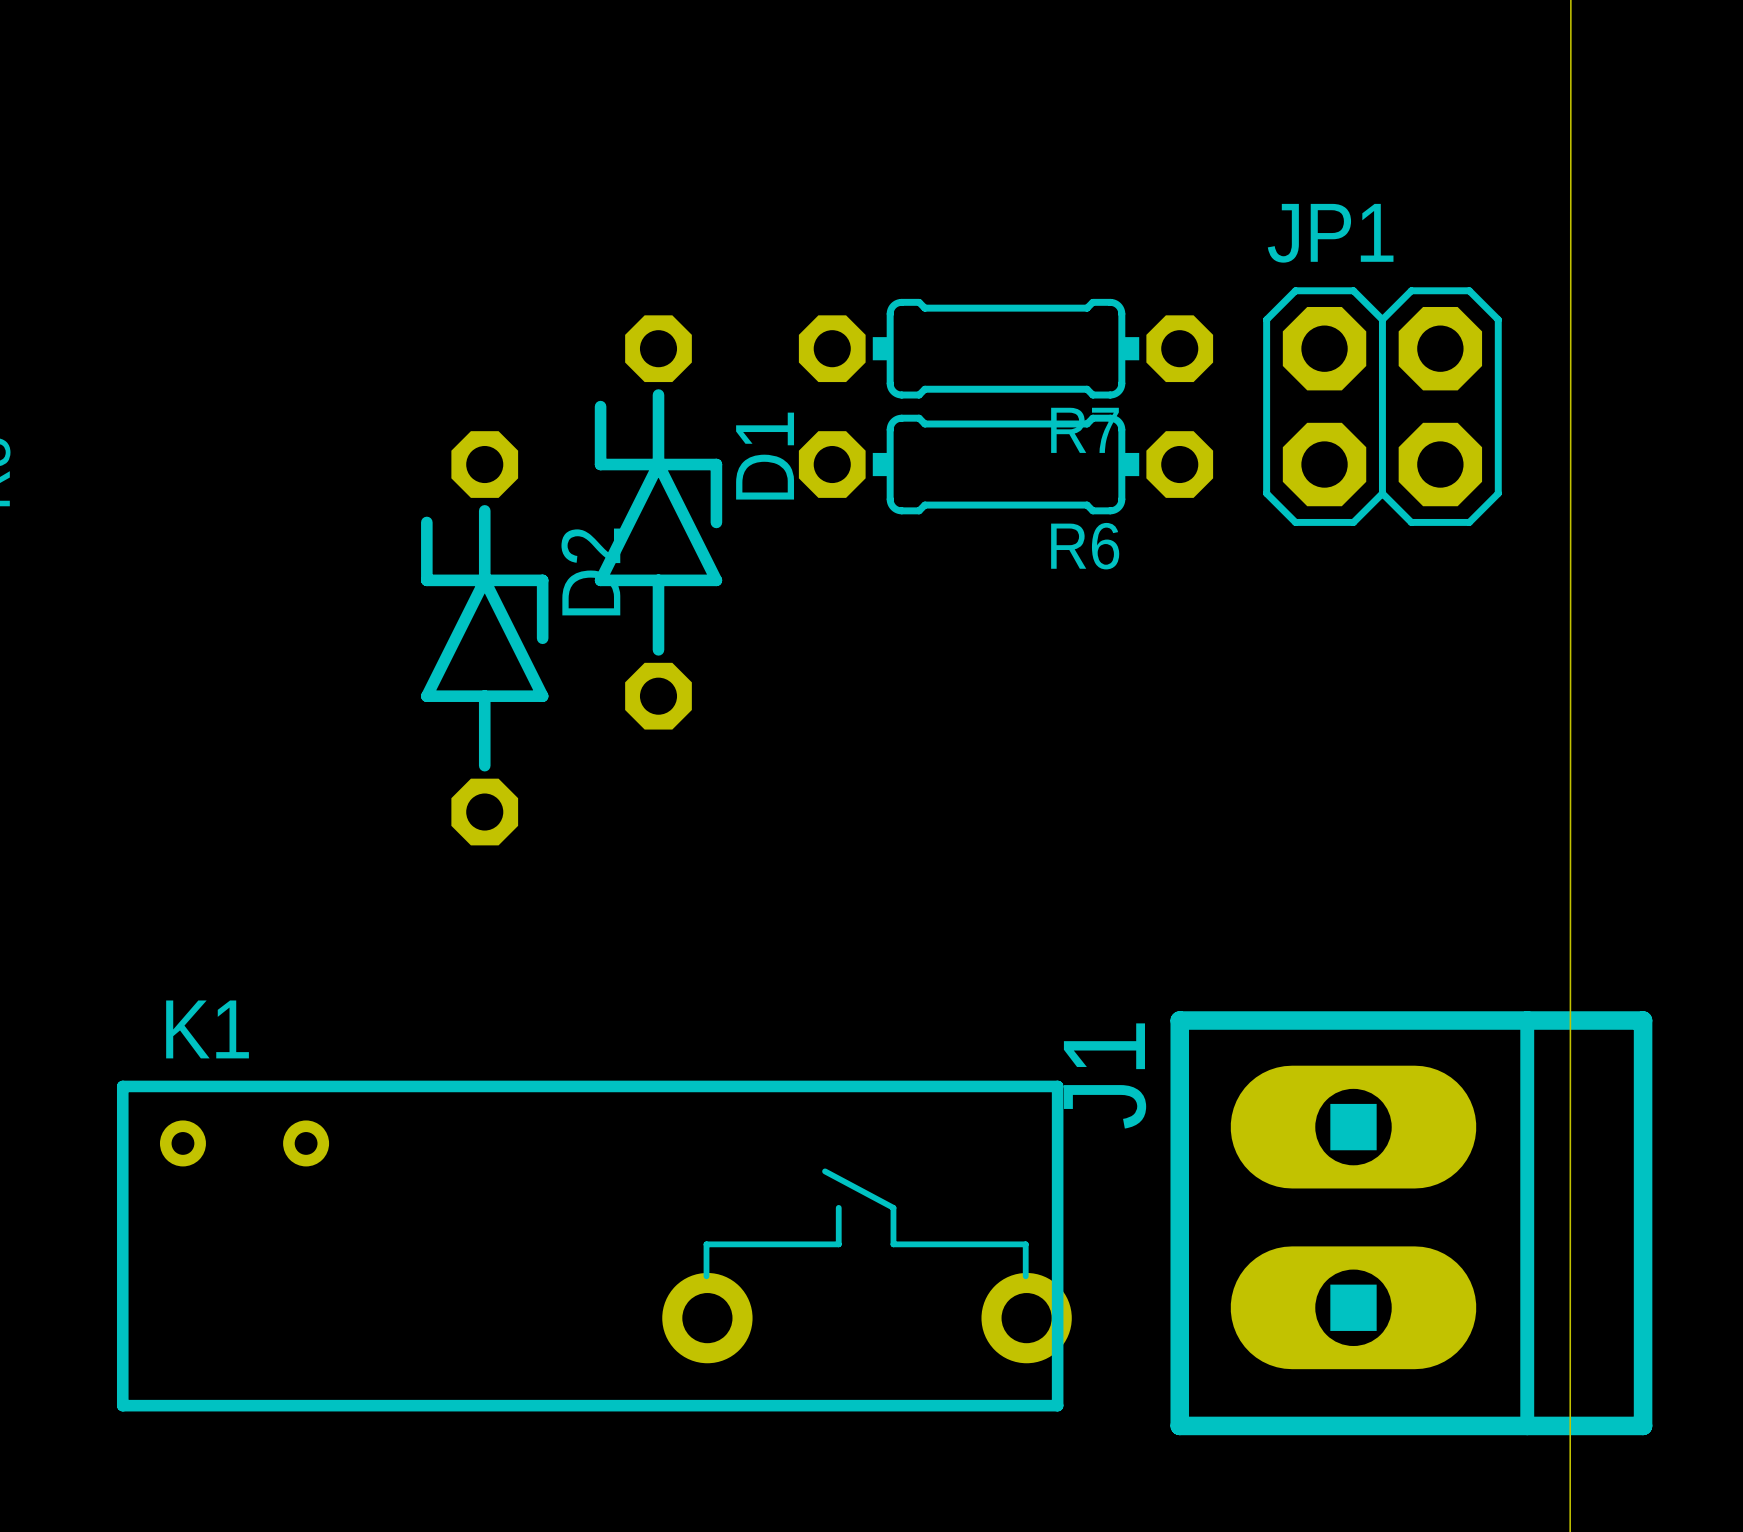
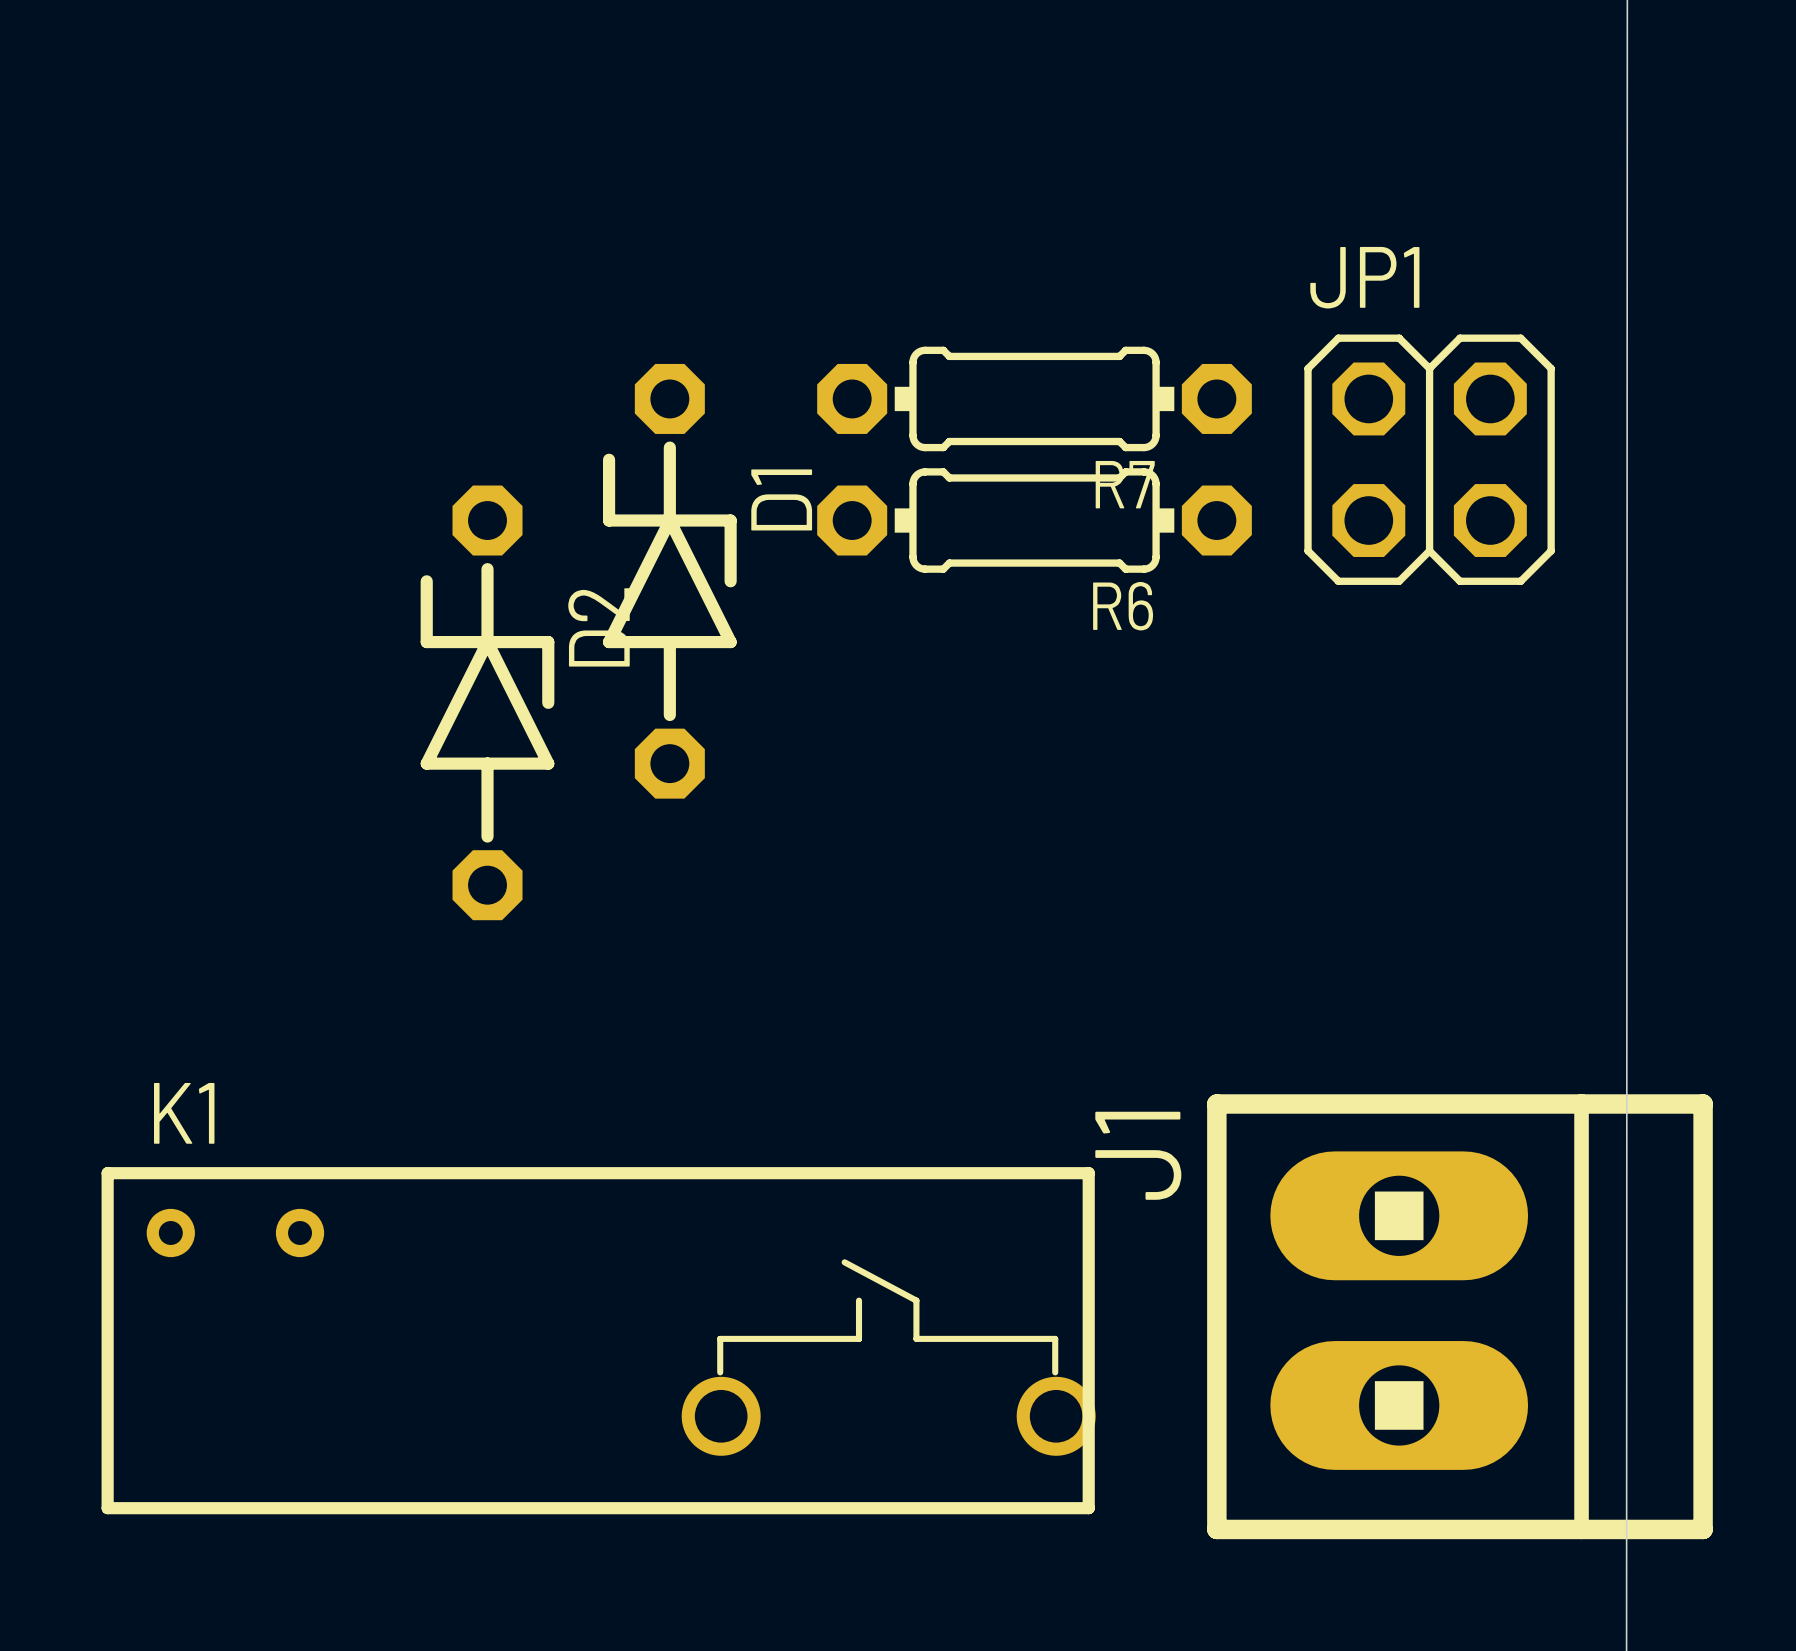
JP1 footprint: [1263, 287, 1502, 526] -> [1304, 334, 1555, 585]
K1 footprint: [116, 1080, 1072, 1412] -> [101, 1167, 1096, 1515]

